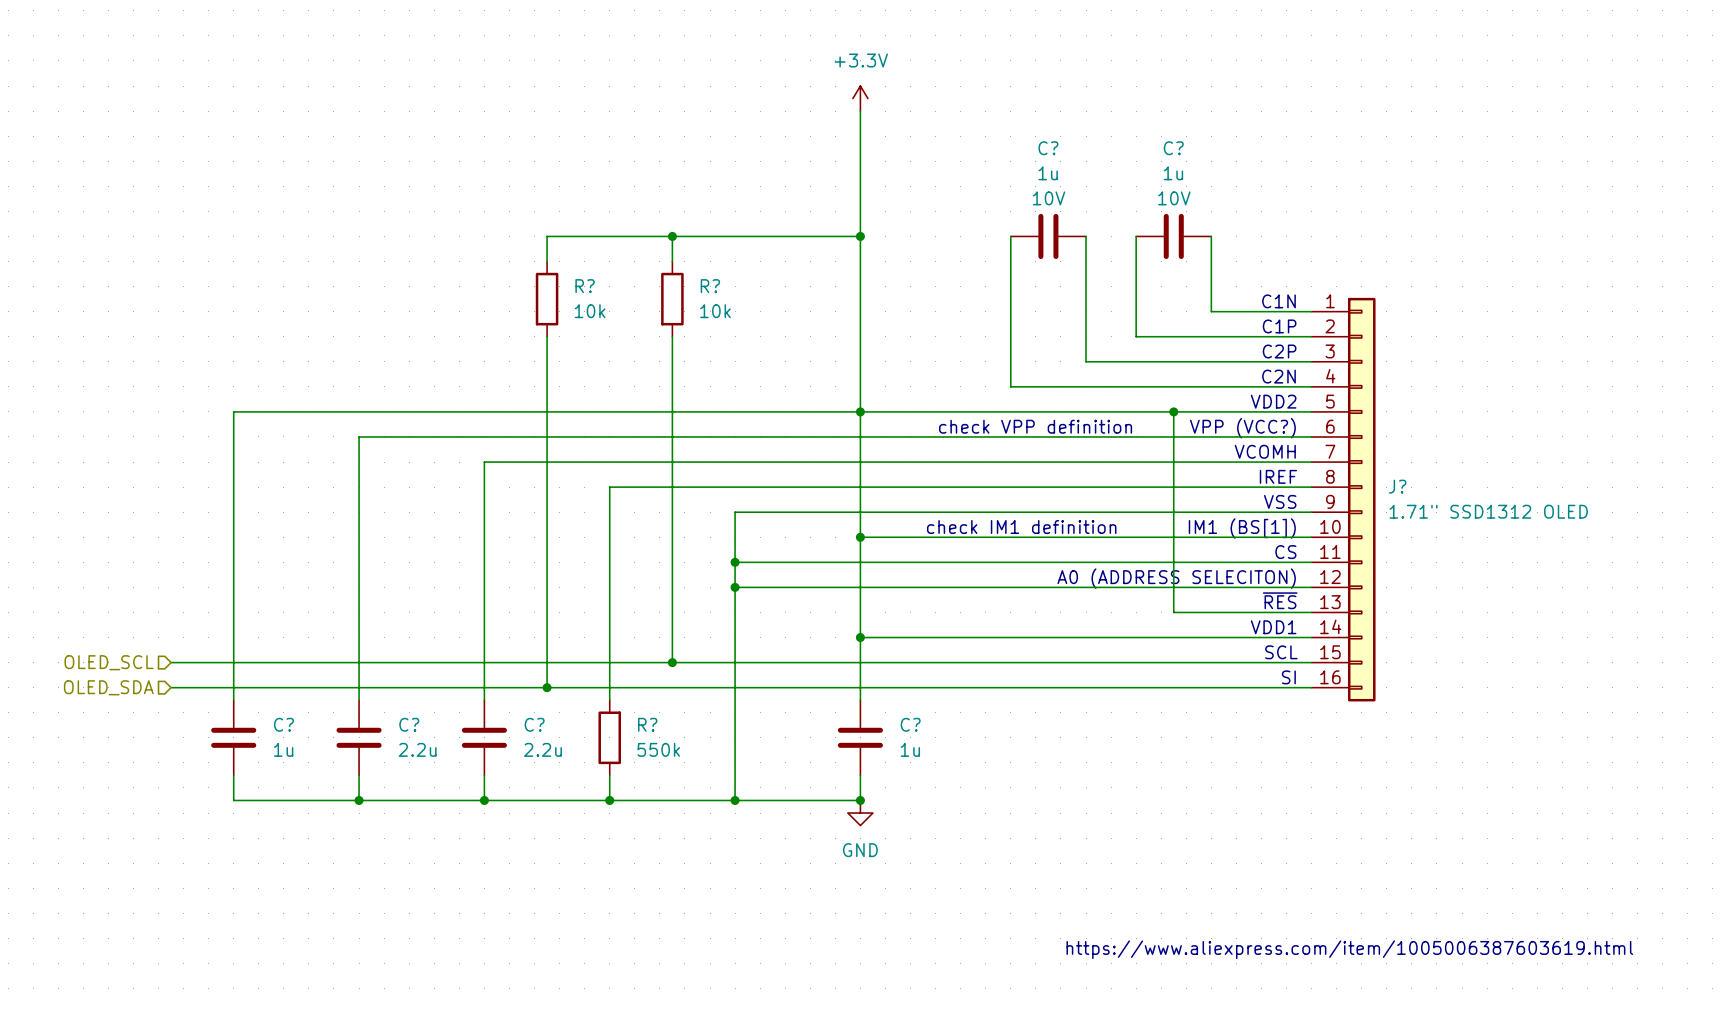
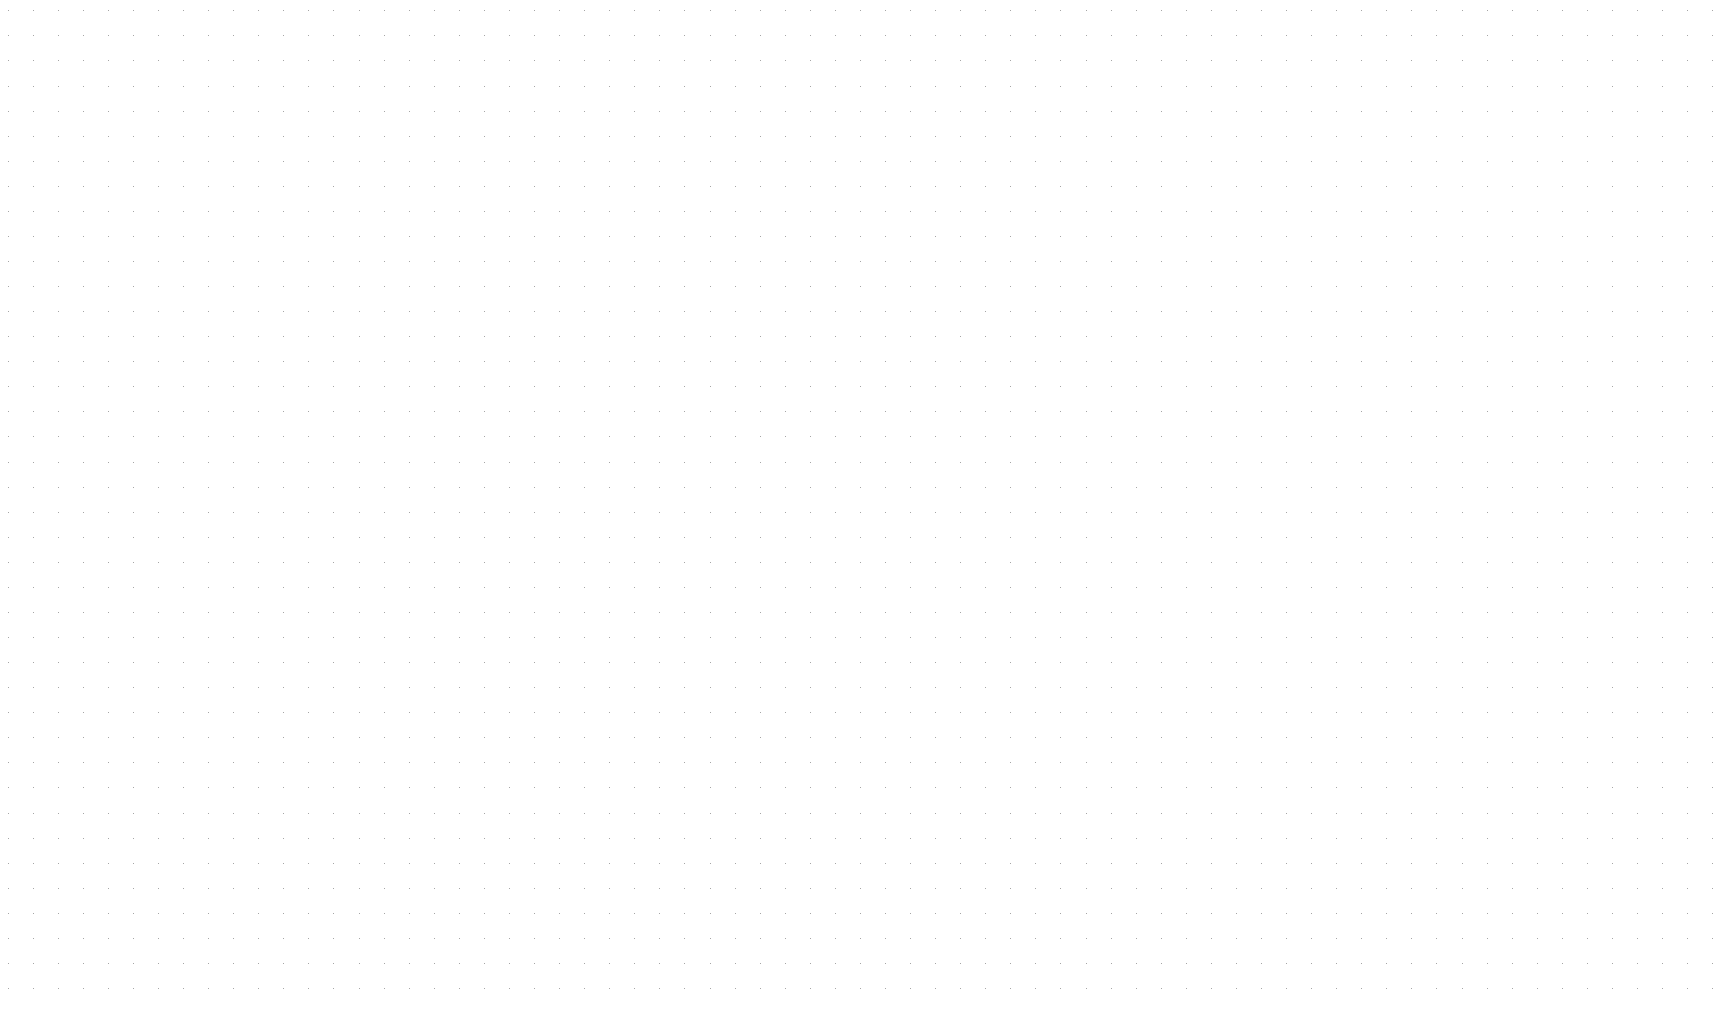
power symbol: +3.3V (860, 98) -> none
wire: (860, 111) (860, 700) -> none
wire: (672, 236) (672, 261) -> none
junction: (672, 236) -> none
wire: (860, 236) (547, 236) (547, 261) -> none
junction: (860, 236) -> none
wire: (1010, 236) (1010, 386) (1311, 386) -> none
C?: 1u (1048, 236) -> none
wire: (1086, 236) (1086, 361) (1311, 361) -> none
wire: (1136, 236) (1136, 336) (1311, 336) -> none
C?: 1u (1173, 236) -> none
wire: (1211, 236) (1211, 311) (1311, 311) -> none
R?: 10k (547, 299) -> none
R?: 10k (672, 299) -> none
text: C1N (1279, 301) -> none
text: C1P (1279, 326) -> none
wire: (547, 336) (547, 687) -> none
wire: (672, 336) (672, 662) -> none
text: C2P (1279, 351) -> none
text: C2N (1279, 376) -> none
text: VDD2 (1273, 401) -> none
junction: (860, 411) -> none
wire: (1173, 411) (1173, 612) (1311, 612) -> none
junction: (1173, 411) -> none
wire: (1311, 411) (233, 411) (233, 700) -> none
text: check VPP definition (1035, 426) -> none
text: VPP (VCC?) (1242, 428) -> none
wire: (1311, 436) (359, 436) (359, 700) -> none
text: VCOMH (1265, 451) -> none
wire: (1311, 462) (484, 462) (484, 700) -> none
text: IREF (1278, 476) -> none
wire: (1311, 487) (609, 487) (609, 700) -> none
J?: 1.71" SSD1312 OLED (1343, 499) -> none
text: VSS (1280, 501) -> none
wire: (1311, 512) (735, 512) (735, 800) -> none
text: check IM1 definition (1021, 526) -> none
text: IM1 (BS[1]) (1242, 528) -> none
wire: (860, 537) (1311, 537) -> none
junction: (860, 537) -> none
text: CS (1285, 552) -> none
wire: (735, 562) (1311, 562) -> none
junction: (735, 562) -> none
text: A0 (ADDRESS SELECITON) (1176, 578) -> none
wire: (735, 587) (1311, 587) -> none
junction: (735, 587) -> none
text: ~{RES} (1280, 600) -> none
text: VDD1 (1273, 627) -> none
wire: (860, 637) (1311, 637) -> none
junction: (860, 637) -> none
text: SCL (1281, 652) -> none
hierarchical label: OLED_SCL (109, 662) -> none
wire: (171, 662) (1311, 662) -> none
junction: (672, 662) -> none
text: SI (1288, 677) -> none
hierarchical label: OLED_SDA (108, 687) -> none
wire: (171, 687) (1311, 687) -> none
junction: (547, 687) -> none
C?: 1u (233, 737) -> none
C?: 2.2u (359, 737) -> none
C?: 2.2u (484, 737) -> none
R?: 550k (609, 737) -> none
C?: 1u (860, 737) -> none
wire: (233, 775) (233, 800) (860, 800) (860, 775) -> none
wire: (359, 775) (359, 800) -> none
wire: (484, 775) (484, 800) -> none
wire: (609, 775) (609, 800) -> none
junction: (359, 800) -> none
junction: (484, 800) -> none
junction: (609, 800) -> none
junction: (735, 800) -> none
junction: (860, 800) -> none
power symbol: GND (860, 813) -> none
text: https://www.aliexpress.com/item/1005006387603619.html (1349, 949) -> none

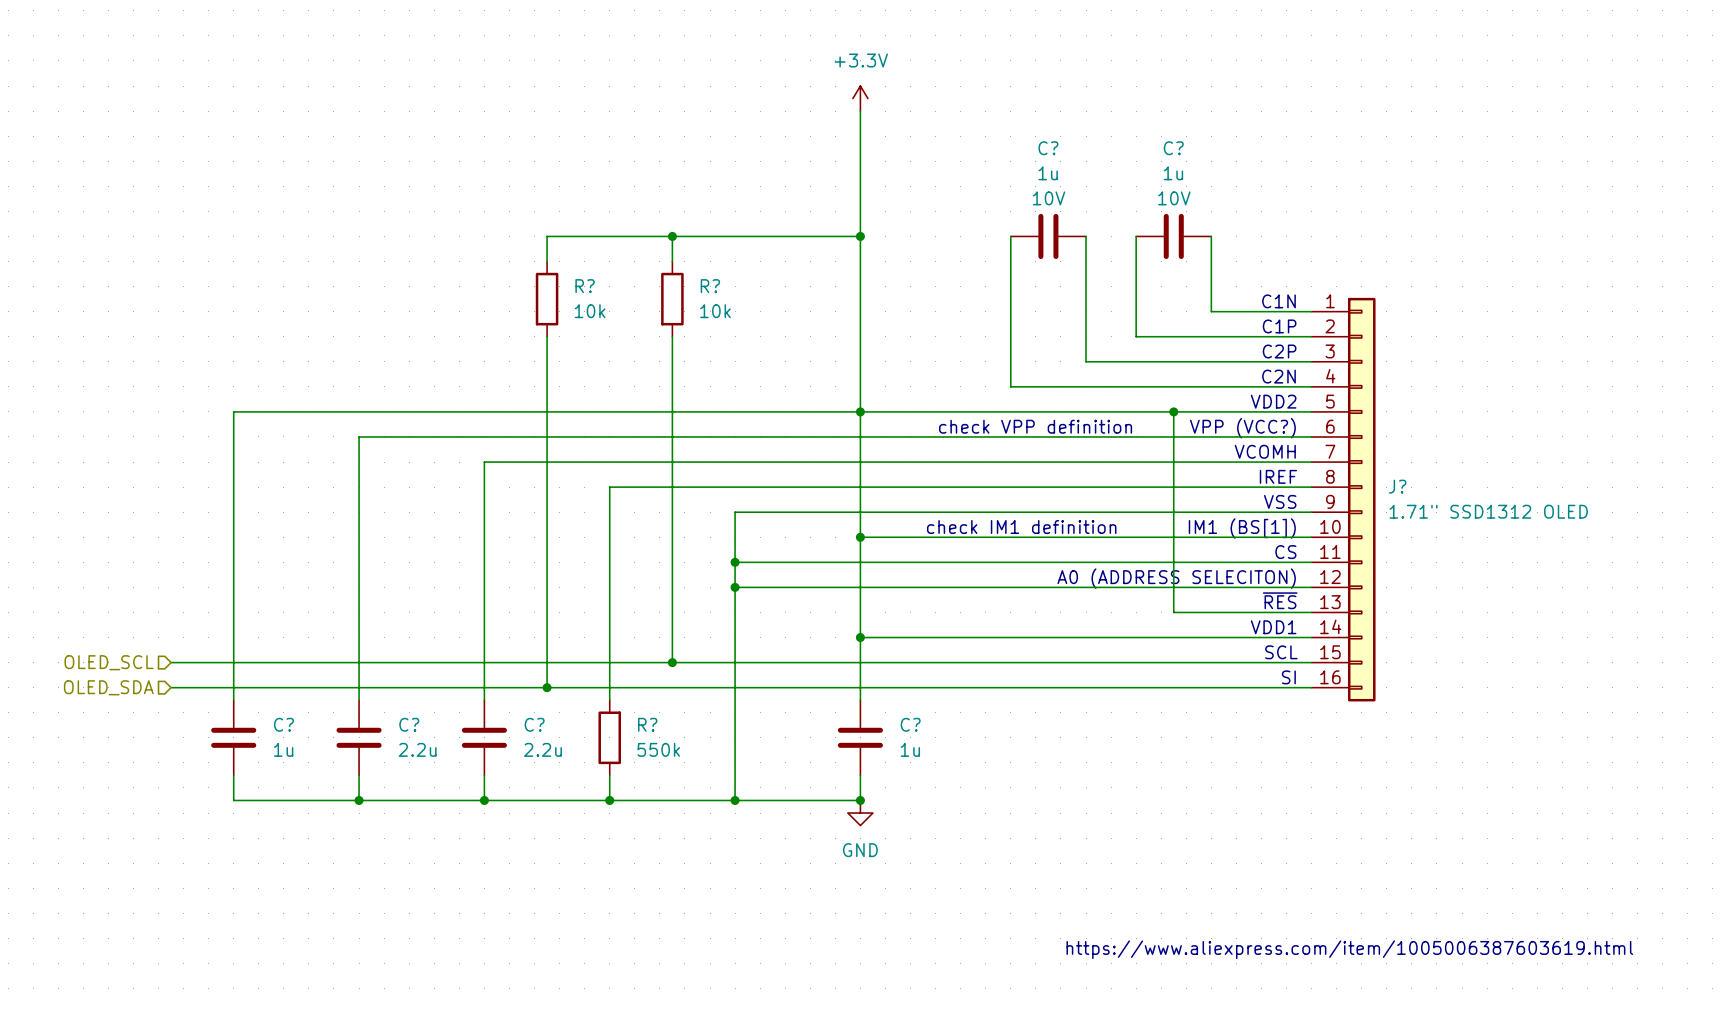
power symbol: none -> +3.3V (860, 98)
wire: none -> (860, 111) (860, 700)
wire: none -> (672, 236) (672, 261)
junction: none -> (672, 236)
wire: none -> (860, 236) (547, 236) (547, 261)
junction: none -> (860, 236)
wire: none -> (1010, 236) (1010, 386) (1311, 386)
C?: none -> 1u (1048, 236)
wire: none -> (1086, 236) (1086, 361) (1311, 361)
wire: none -> (1136, 236) (1136, 336) (1311, 336)
C?: none -> 1u (1173, 236)
wire: none -> (1211, 236) (1211, 311) (1311, 311)
R?: none -> 10k (547, 299)
R?: none -> 10k (672, 299)
text: none -> C1N (1279, 301)
text: none -> C1P (1279, 326)
wire: none -> (547, 336) (547, 687)
wire: none -> (672, 336) (672, 662)
text: none -> C2P (1279, 351)
text: none -> C2N (1279, 376)
text: none -> VDD2 (1273, 401)
junction: none -> (860, 411)
wire: none -> (1173, 411) (1173, 612) (1311, 612)
junction: none -> (1173, 411)
wire: none -> (1311, 411) (233, 411) (233, 700)
text: none -> check VPP definition (1035, 426)
text: none -> VPP (VCC?) (1242, 428)
wire: none -> (1311, 436) (359, 436) (359, 700)
text: none -> VCOMH (1265, 451)
wire: none -> (1311, 462) (484, 462) (484, 700)
text: none -> IREF (1278, 476)
wire: none -> (1311, 487) (609, 487) (609, 700)
J?: none -> 1.71" SSD1312 OLED (1343, 499)
text: none -> VSS (1280, 501)
wire: none -> (1311, 512) (735, 512) (735, 800)
text: none -> check IM1 definition (1021, 526)
text: none -> IM1 (BS[1]) (1242, 528)
wire: none -> (860, 537) (1311, 537)
junction: none -> (860, 537)
text: none -> CS (1285, 552)
wire: none -> (735, 562) (1311, 562)
junction: none -> (735, 562)
text: none -> A0 (ADDRESS SELECITON) (1176, 578)
wire: none -> (735, 587) (1311, 587)
junction: none -> (735, 587)
text: none -> ~{RES} (1280, 600)
text: none -> VDD1 (1273, 627)
wire: none -> (860, 637) (1311, 637)
junction: none -> (860, 637)
text: none -> SCL (1281, 652)
hierarchical label: none -> OLED_SCL (109, 662)
wire: none -> (171, 662) (1311, 662)
junction: none -> (672, 662)
text: none -> SI (1288, 677)
hierarchical label: none -> OLED_SDA (108, 687)
wire: none -> (171, 687) (1311, 687)
junction: none -> (547, 687)
C?: none -> 1u (233, 737)
C?: none -> 2.2u (359, 737)
C?: none -> 2.2u (484, 737)
R?: none -> 550k (609, 737)
C?: none -> 1u (860, 737)
wire: none -> (233, 775) (233, 800) (860, 800) (860, 775)
wire: none -> (359, 775) (359, 800)
wire: none -> (484, 775) (484, 800)
wire: none -> (609, 775) (609, 800)
junction: none -> (359, 800)
junction: none -> (484, 800)
junction: none -> (609, 800)
junction: none -> (735, 800)
junction: none -> (860, 800)
power symbol: none -> GND (860, 813)
text: none -> https://www.aliexpress.com/item/1005006387603619.html (1349, 949)

